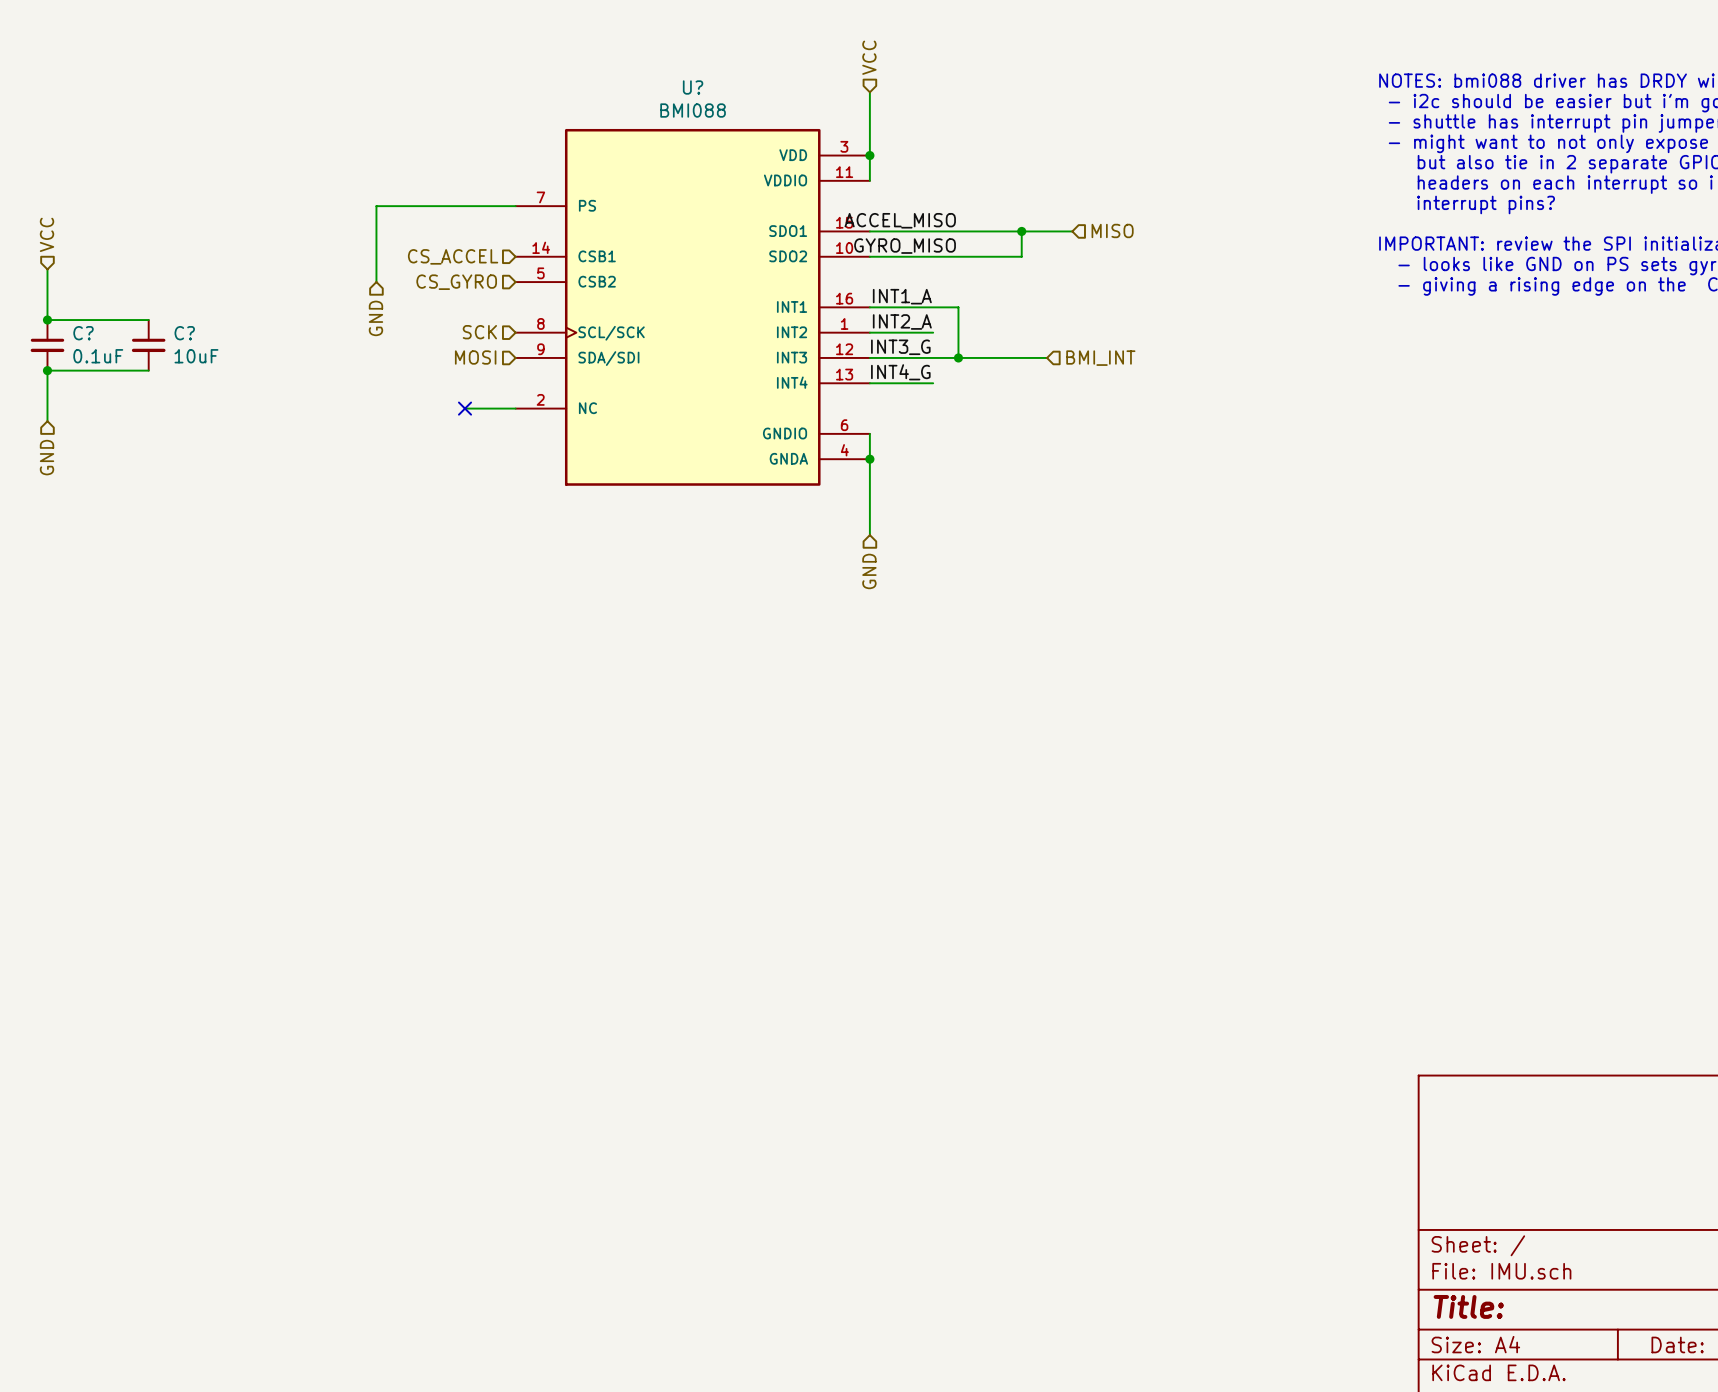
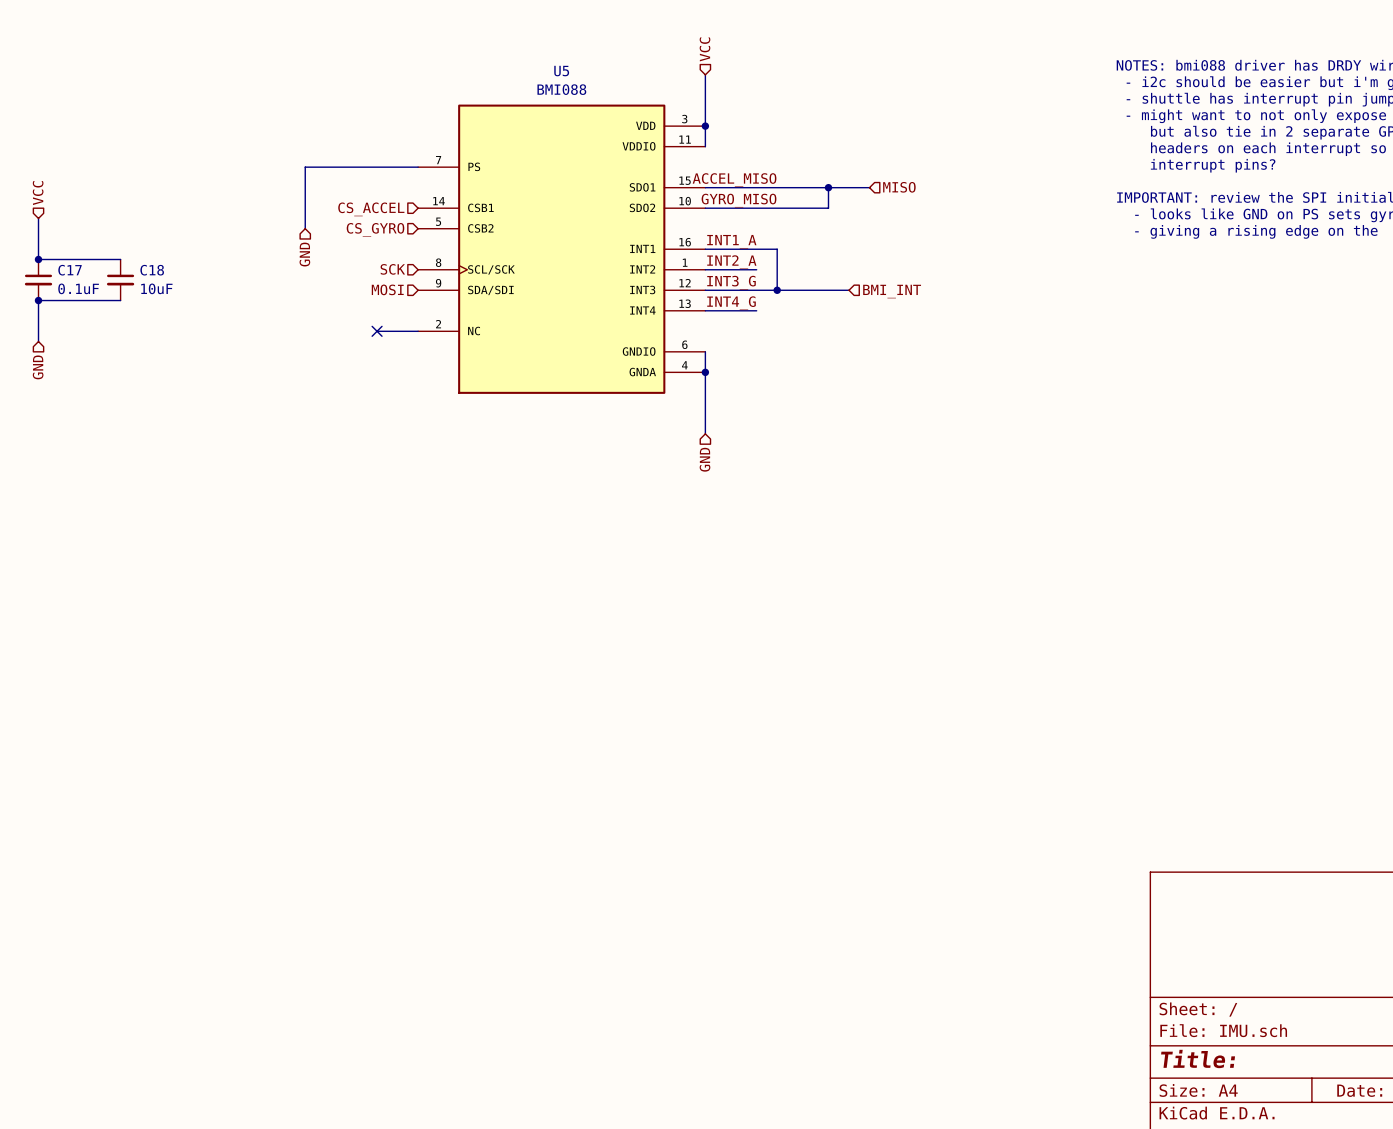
U? name: U? (693, 87) -> U5 (561, 71)
C? name: C? (83, 333) -> C17 (70, 270)
C? name: C? (184, 333) -> C18 (152, 270)

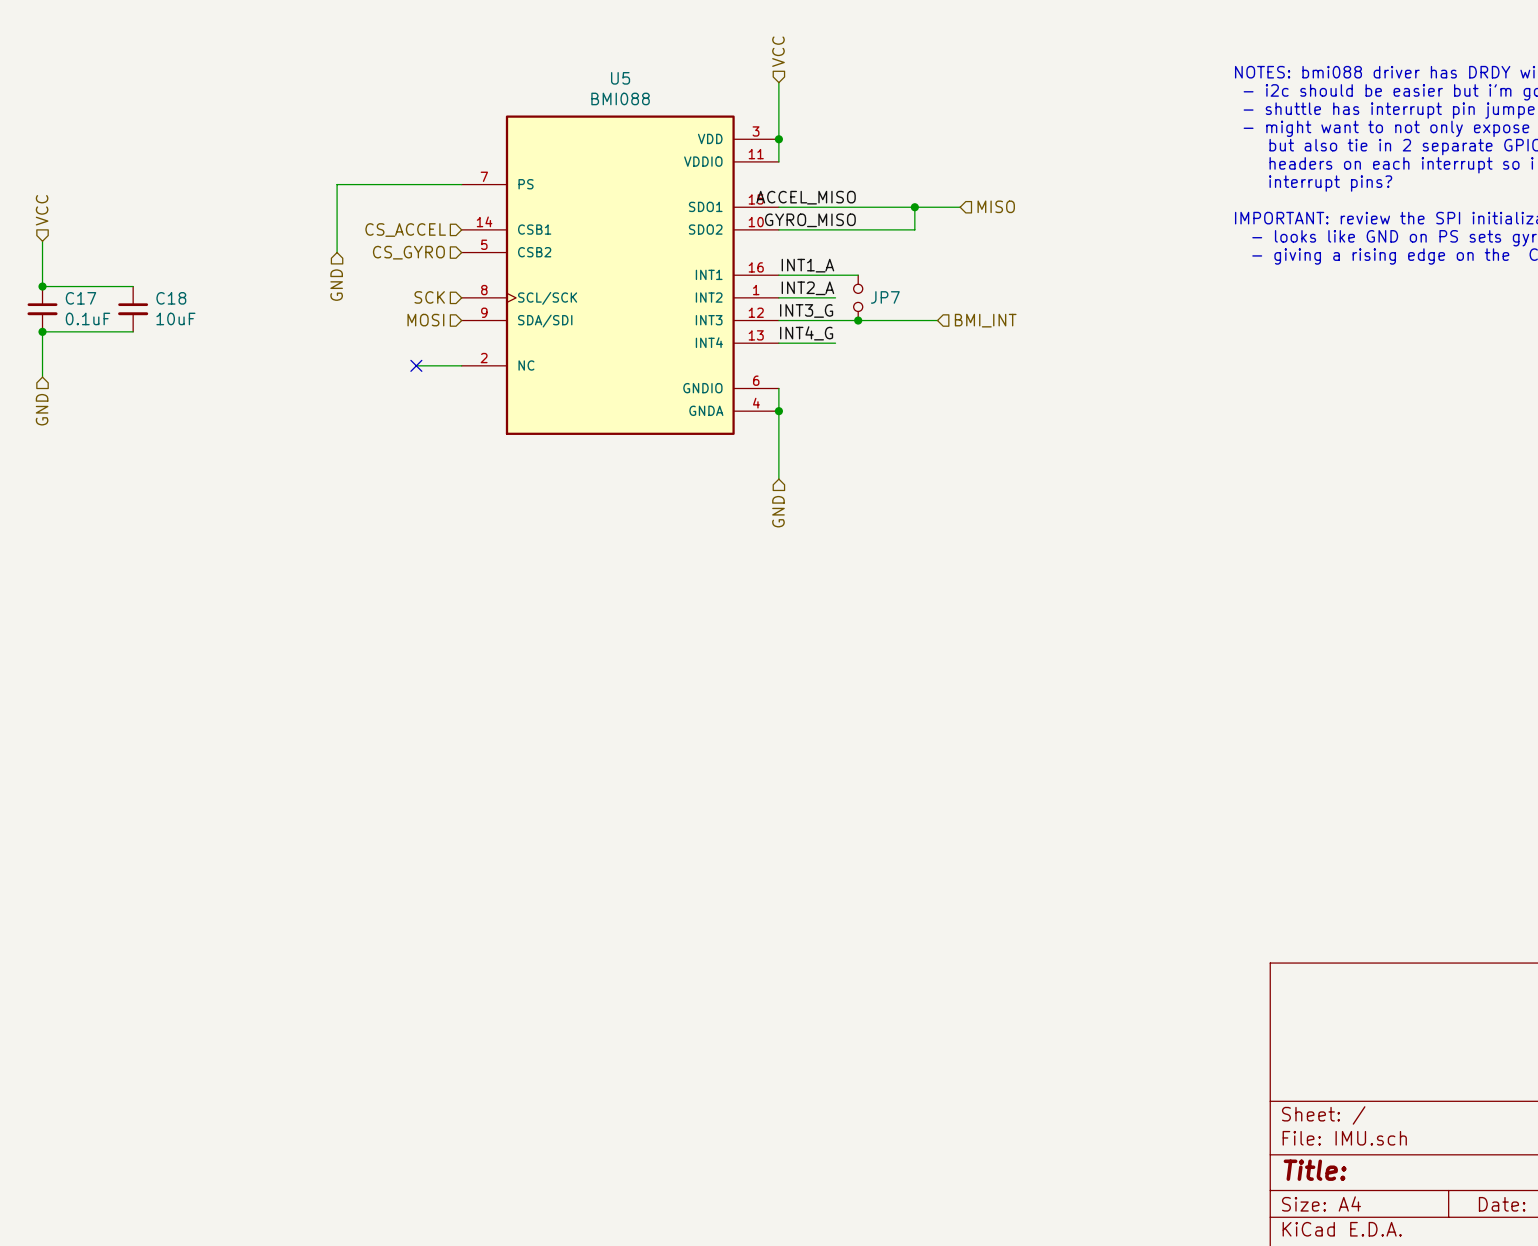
wire: (777, 249) (777, 290) -> none
JP7: none -> (858, 297)

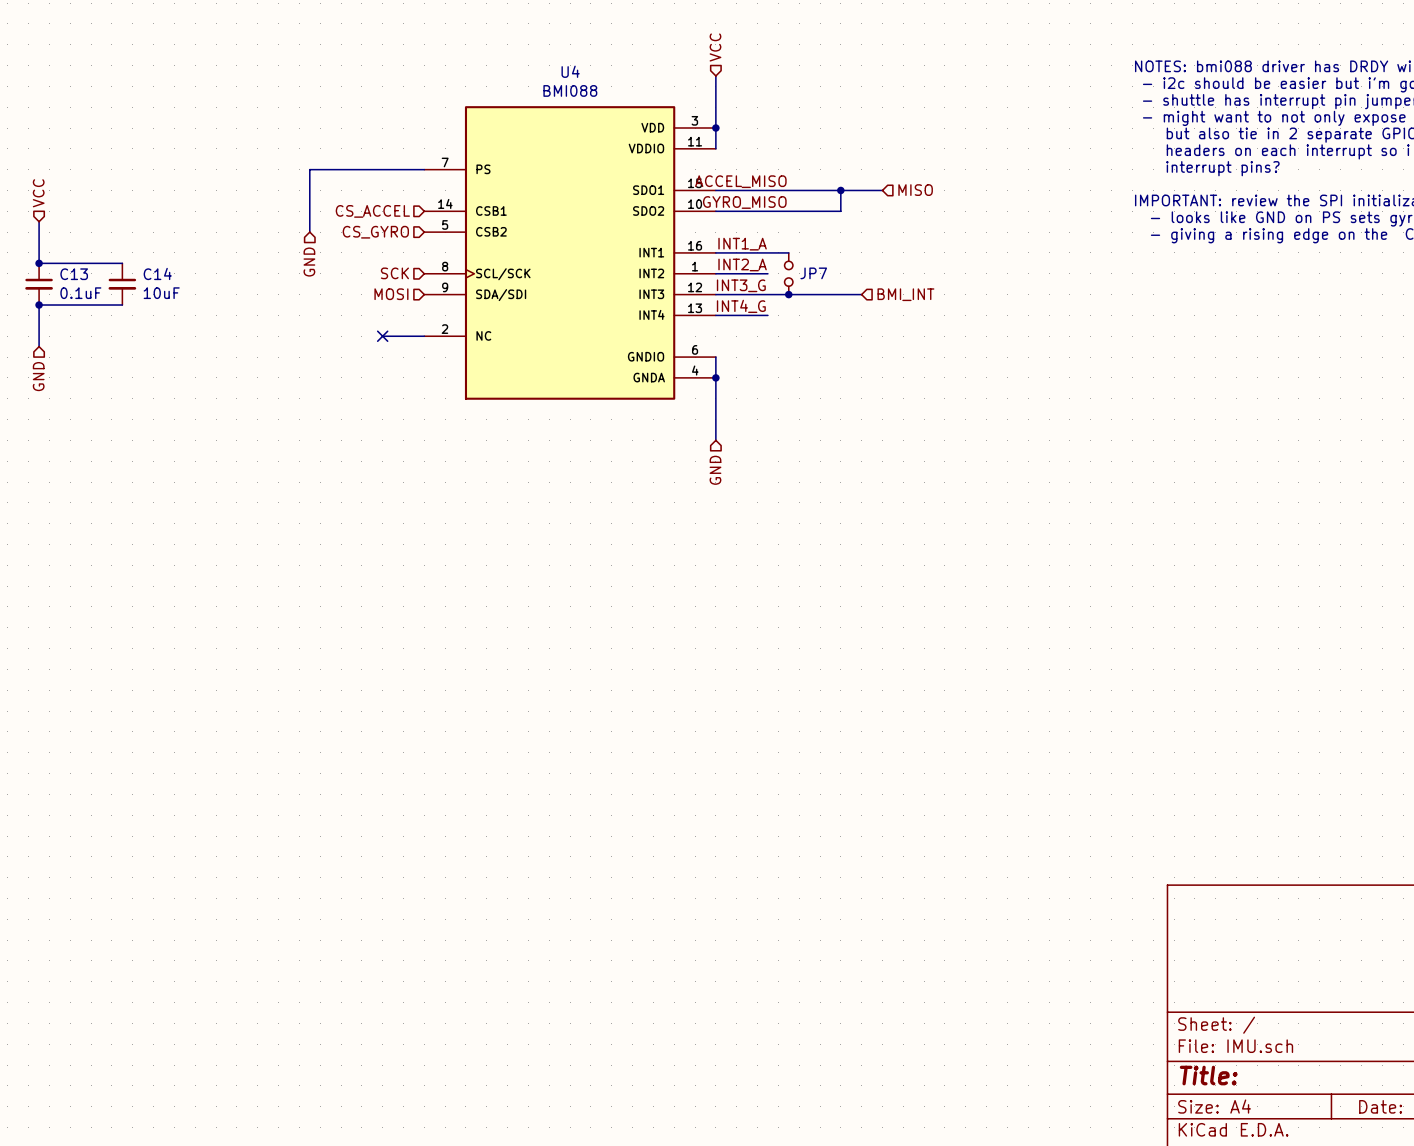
U5 name: U5 (620, 78) -> U4 (570, 71)
C17 name: C17 (80, 298) -> C13 (74, 274)
C18 name: C18 (171, 298) -> C14 (157, 273)

